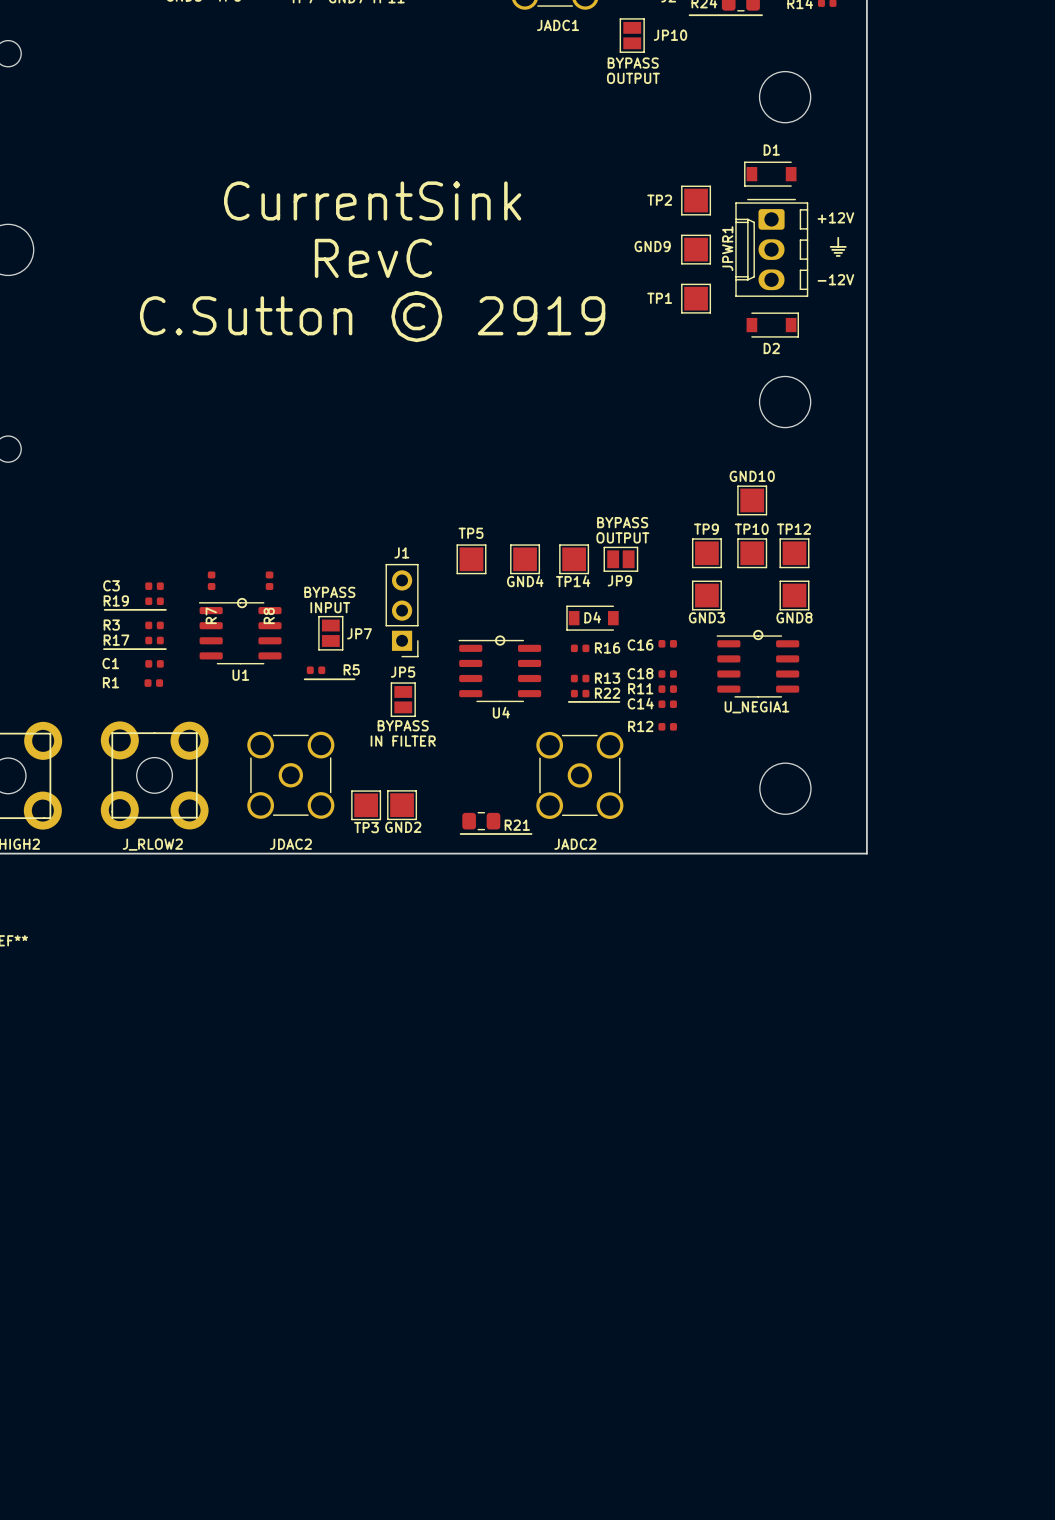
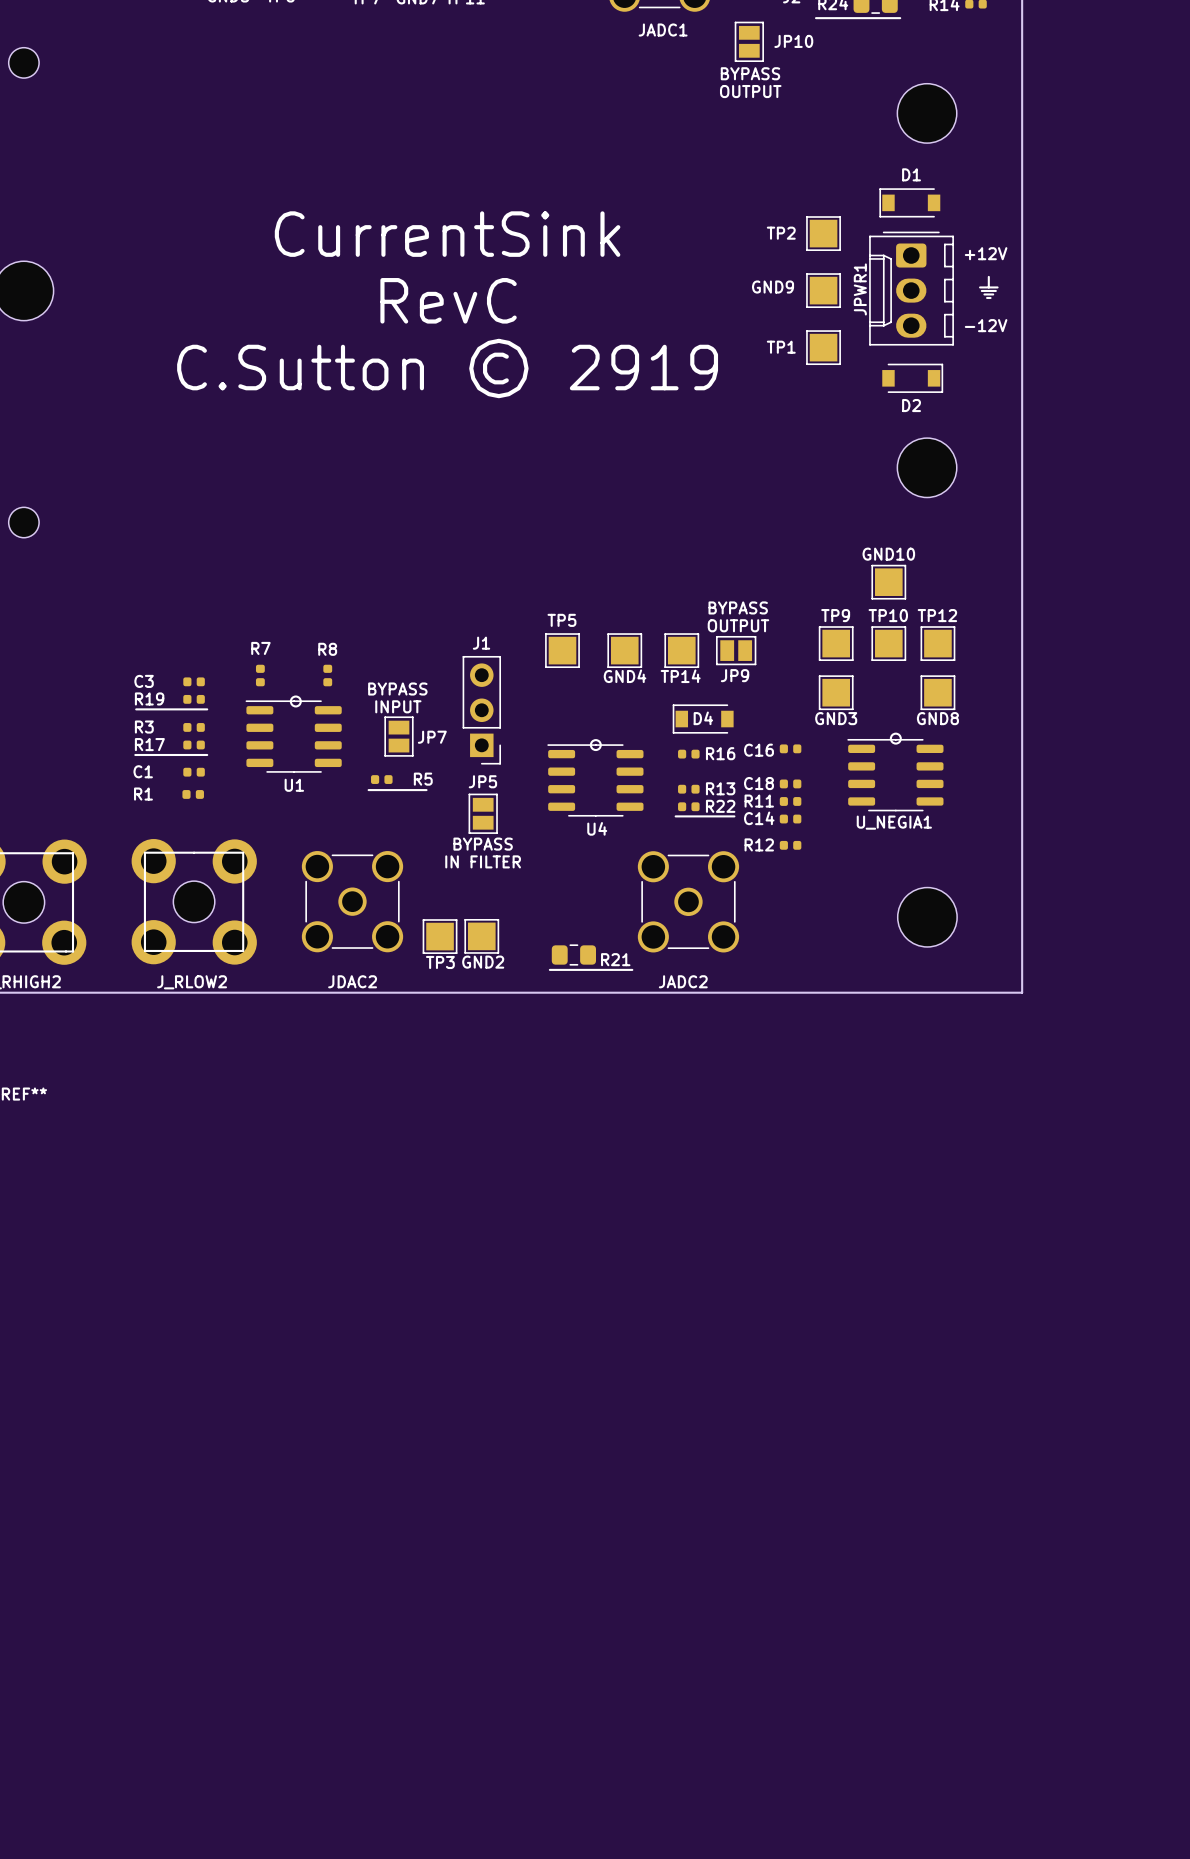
R7 name rotation: 0° (211, 615) -> 90° clockwise (260, 648)
R7 name position: R7 (211, 615) -> R7 (260, 648)
R8 name rotation: 0° (269, 615) -> 90° clockwise (327, 649)
R8 name position: R8 (269, 615) -> R8 (327, 649)

